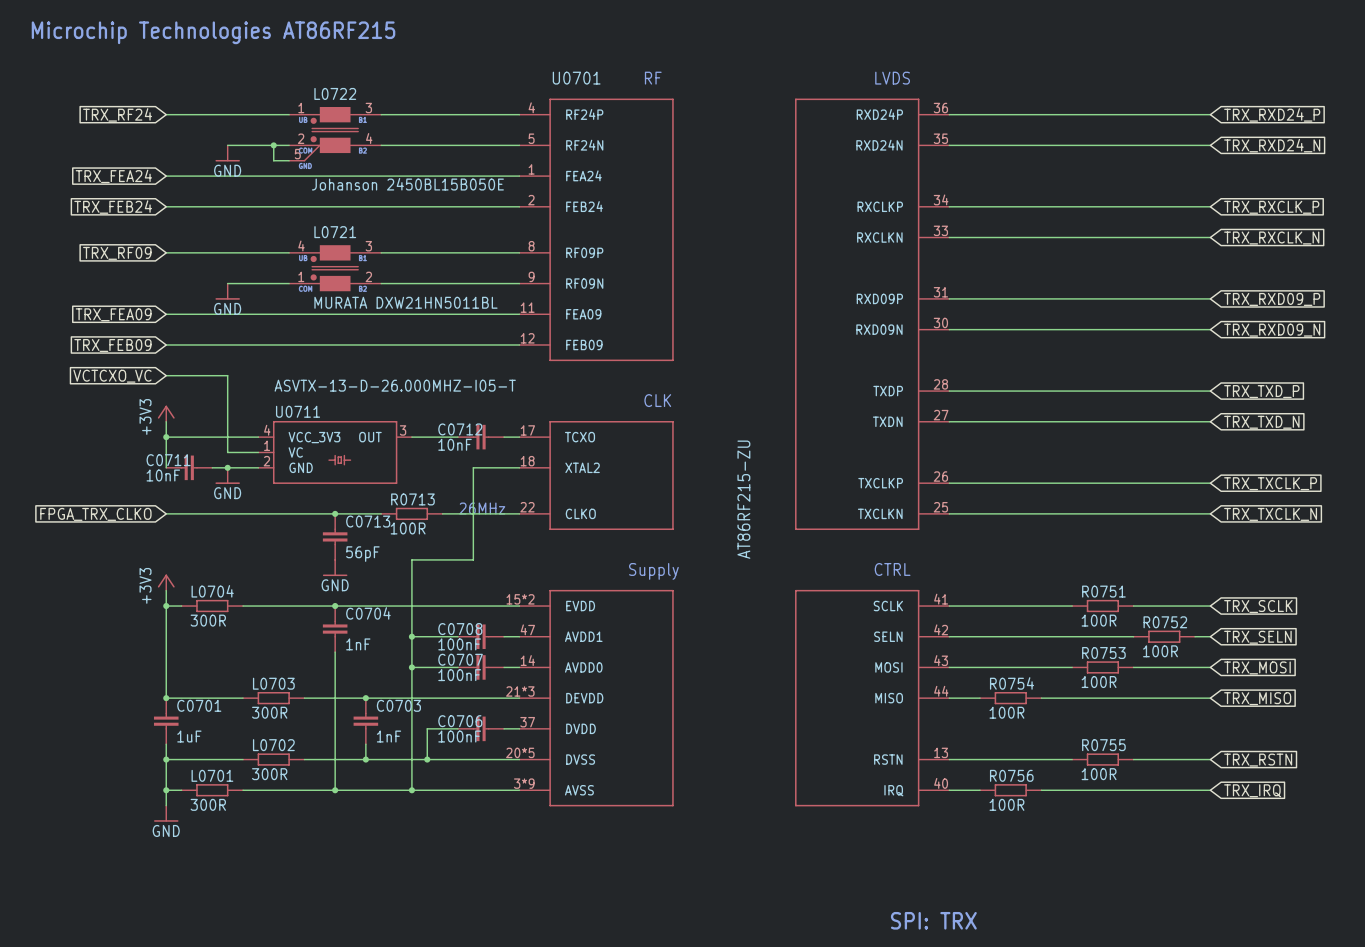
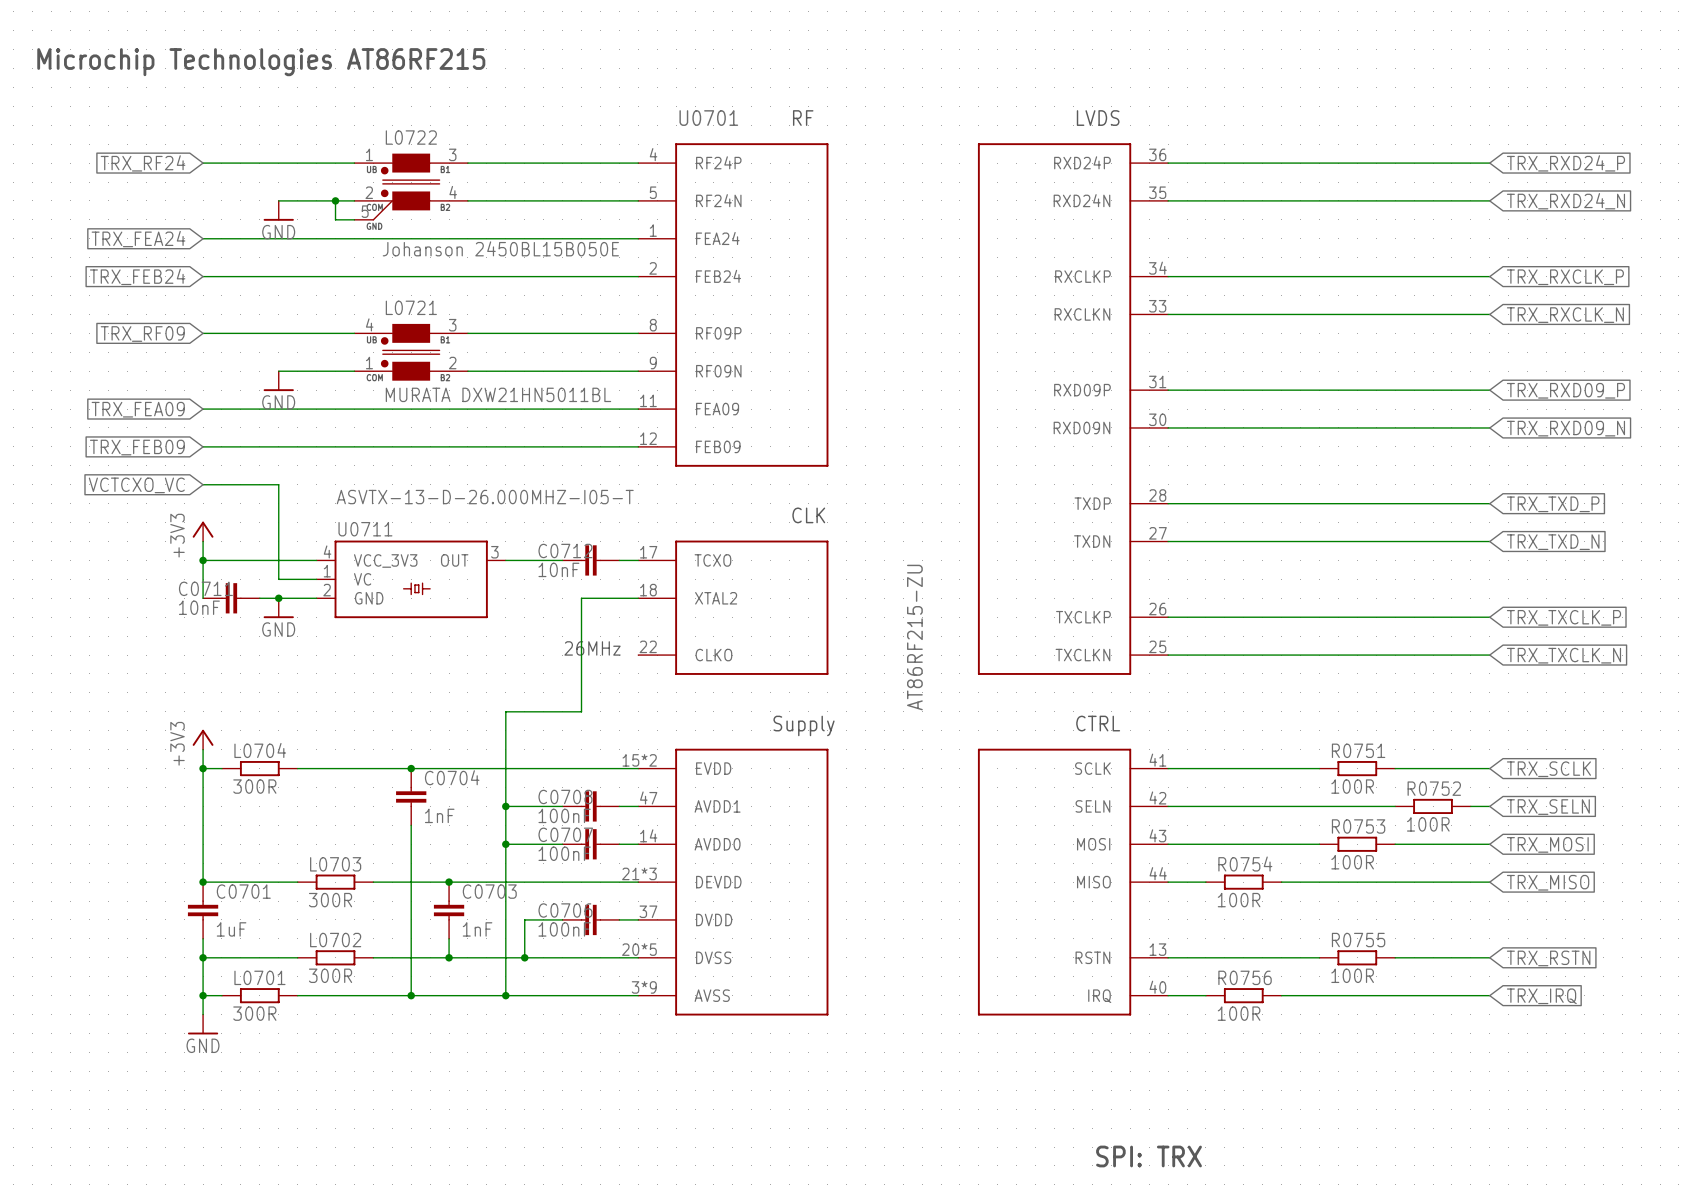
wire: (166, 513) (381, 513) -> none
junction: (335, 513) -> none
R0713: 100R (411, 513) -> none
wire: (442, 513) (519, 513) -> none
global label: FPGA_TRX_CLKO (95, 514) -> none
C0713: 56pF (335, 536) -> none
power symbol: GND (335, 568) -> none

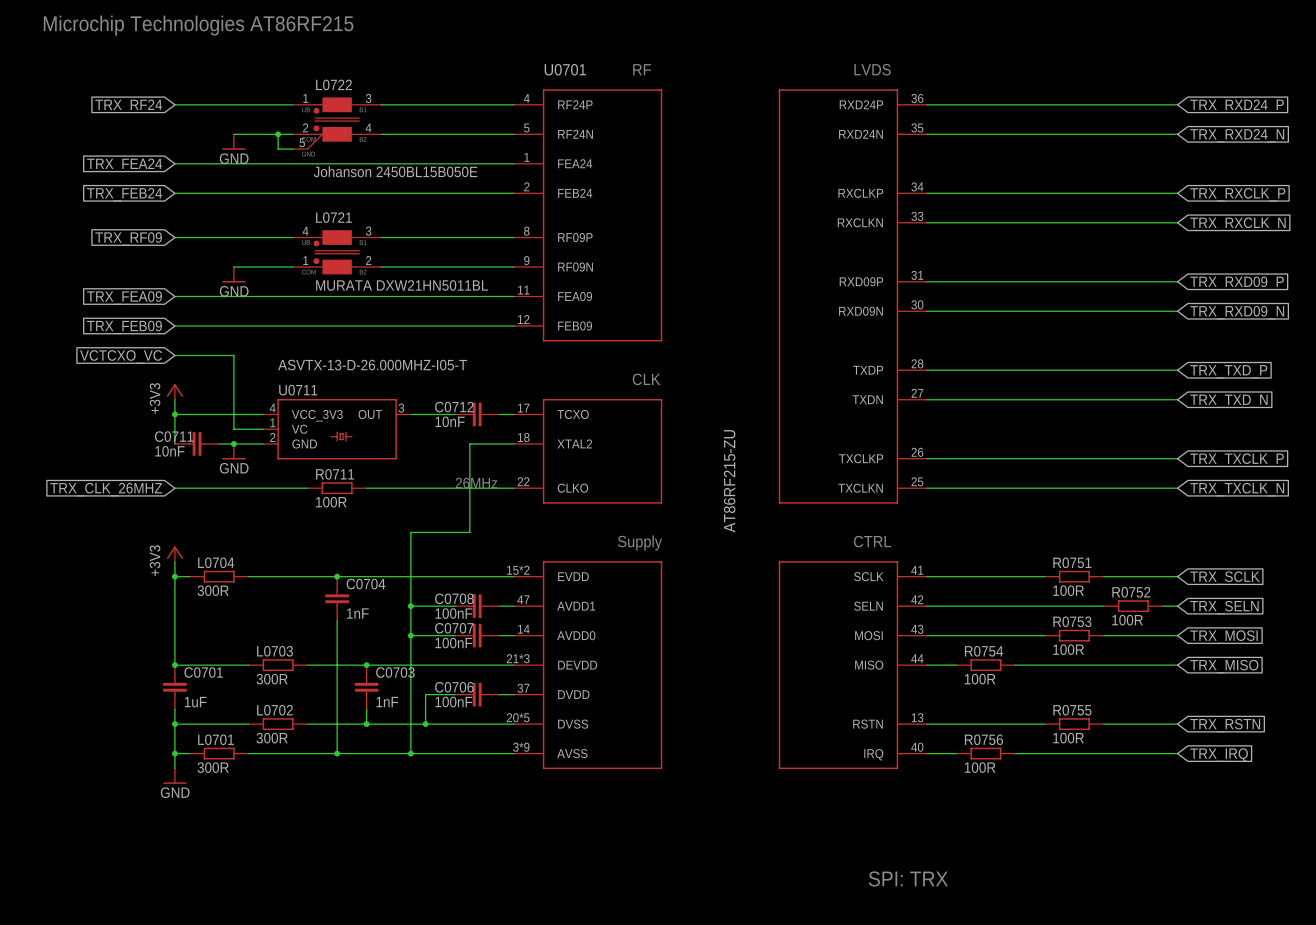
global label: none -> TRX_CLK_26MHZ (106, 489)
wire: none -> (174, 488) (307, 488)
R0711: none -> 100R (337, 488)
wire: none -> (366, 488) (514, 488)

